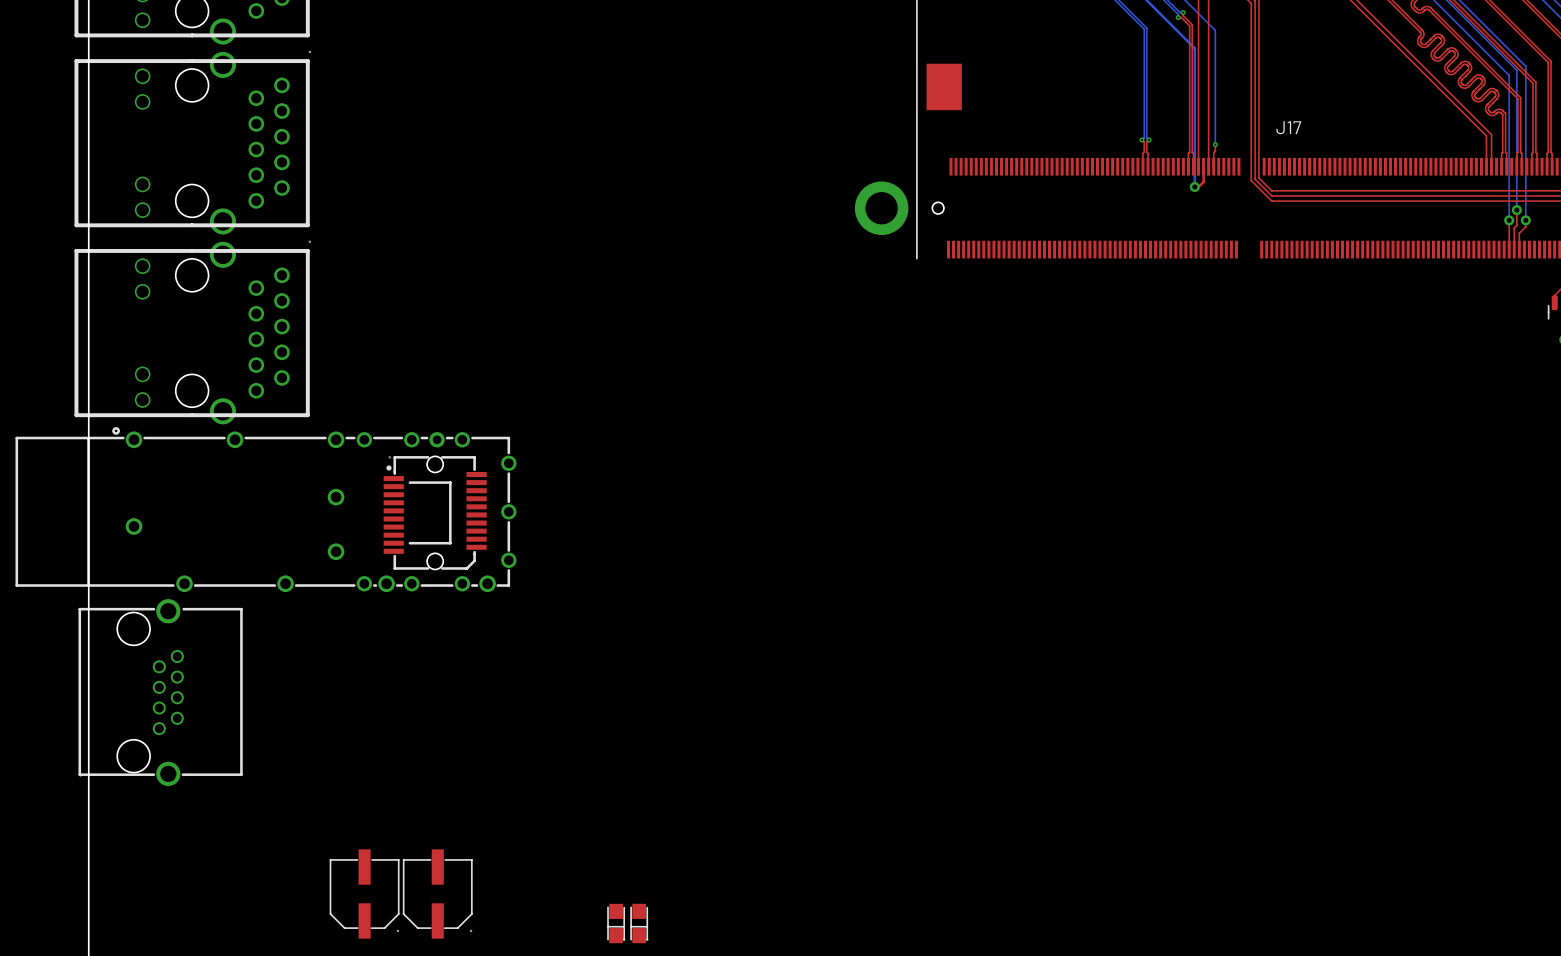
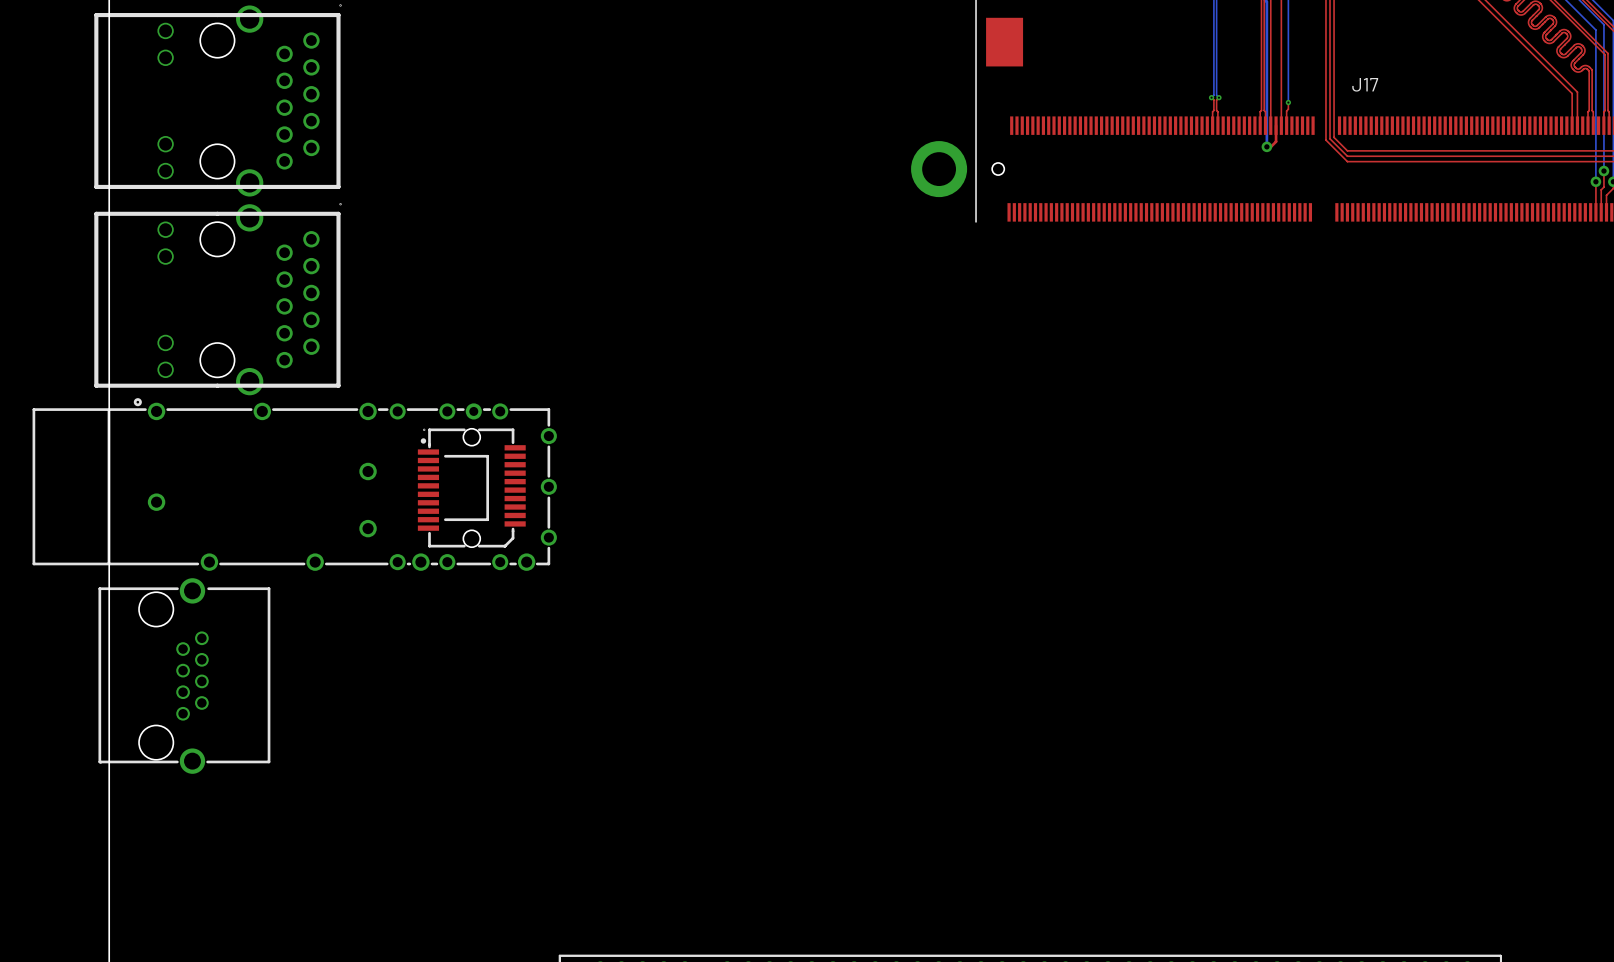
part: (364, 893) -> none
part: (437, 893) -> none
part: (616, 923) -> none
part: (639, 923) -> none

